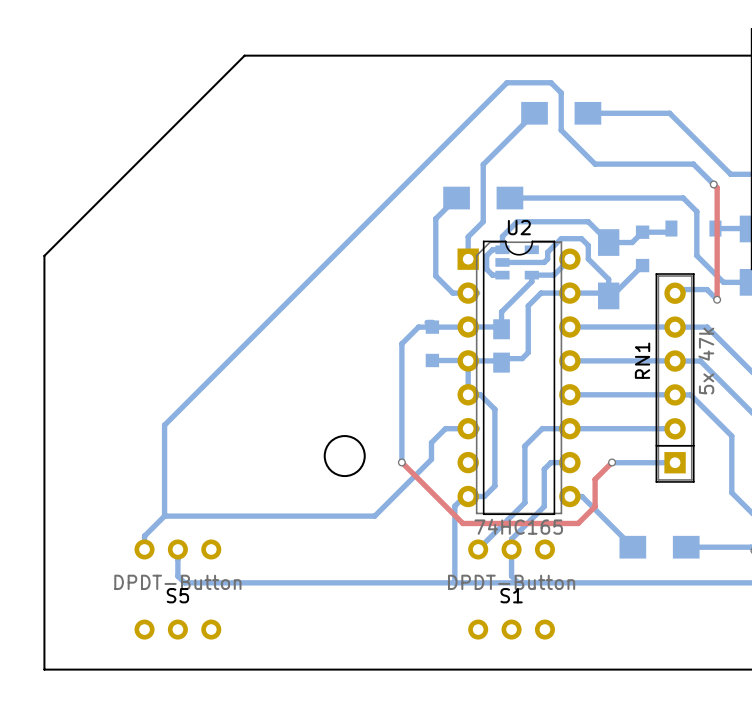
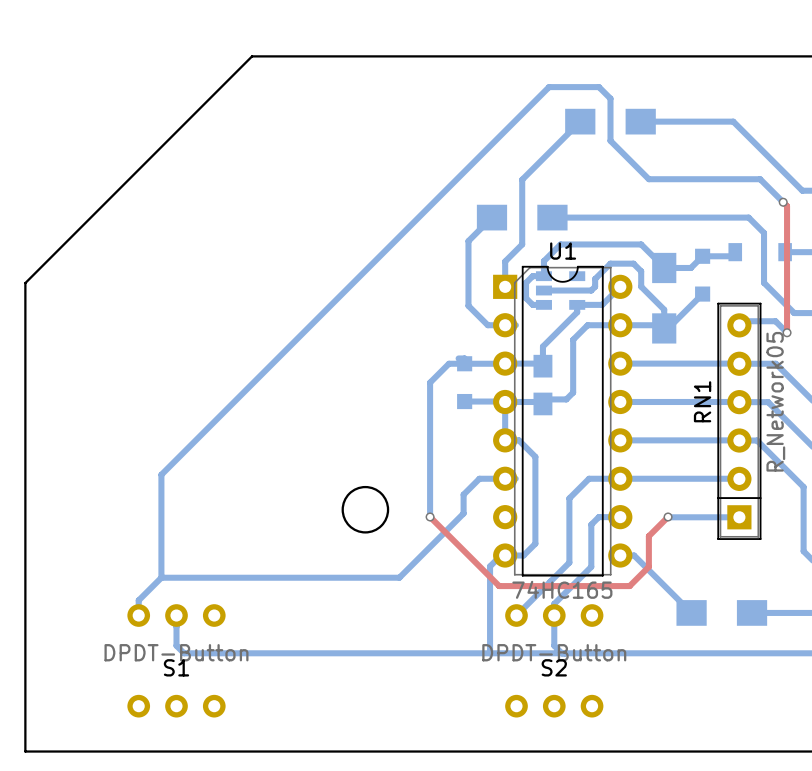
U2 name: U2 (519, 227) -> U1 (563, 251)
RN1 value: 5x 47k (706, 361) -> R_Network05 (775, 401)
S5 name: S5 (177, 595) -> S1 (176, 667)
S1 name: S1 (511, 595) -> S2 (554, 667)

